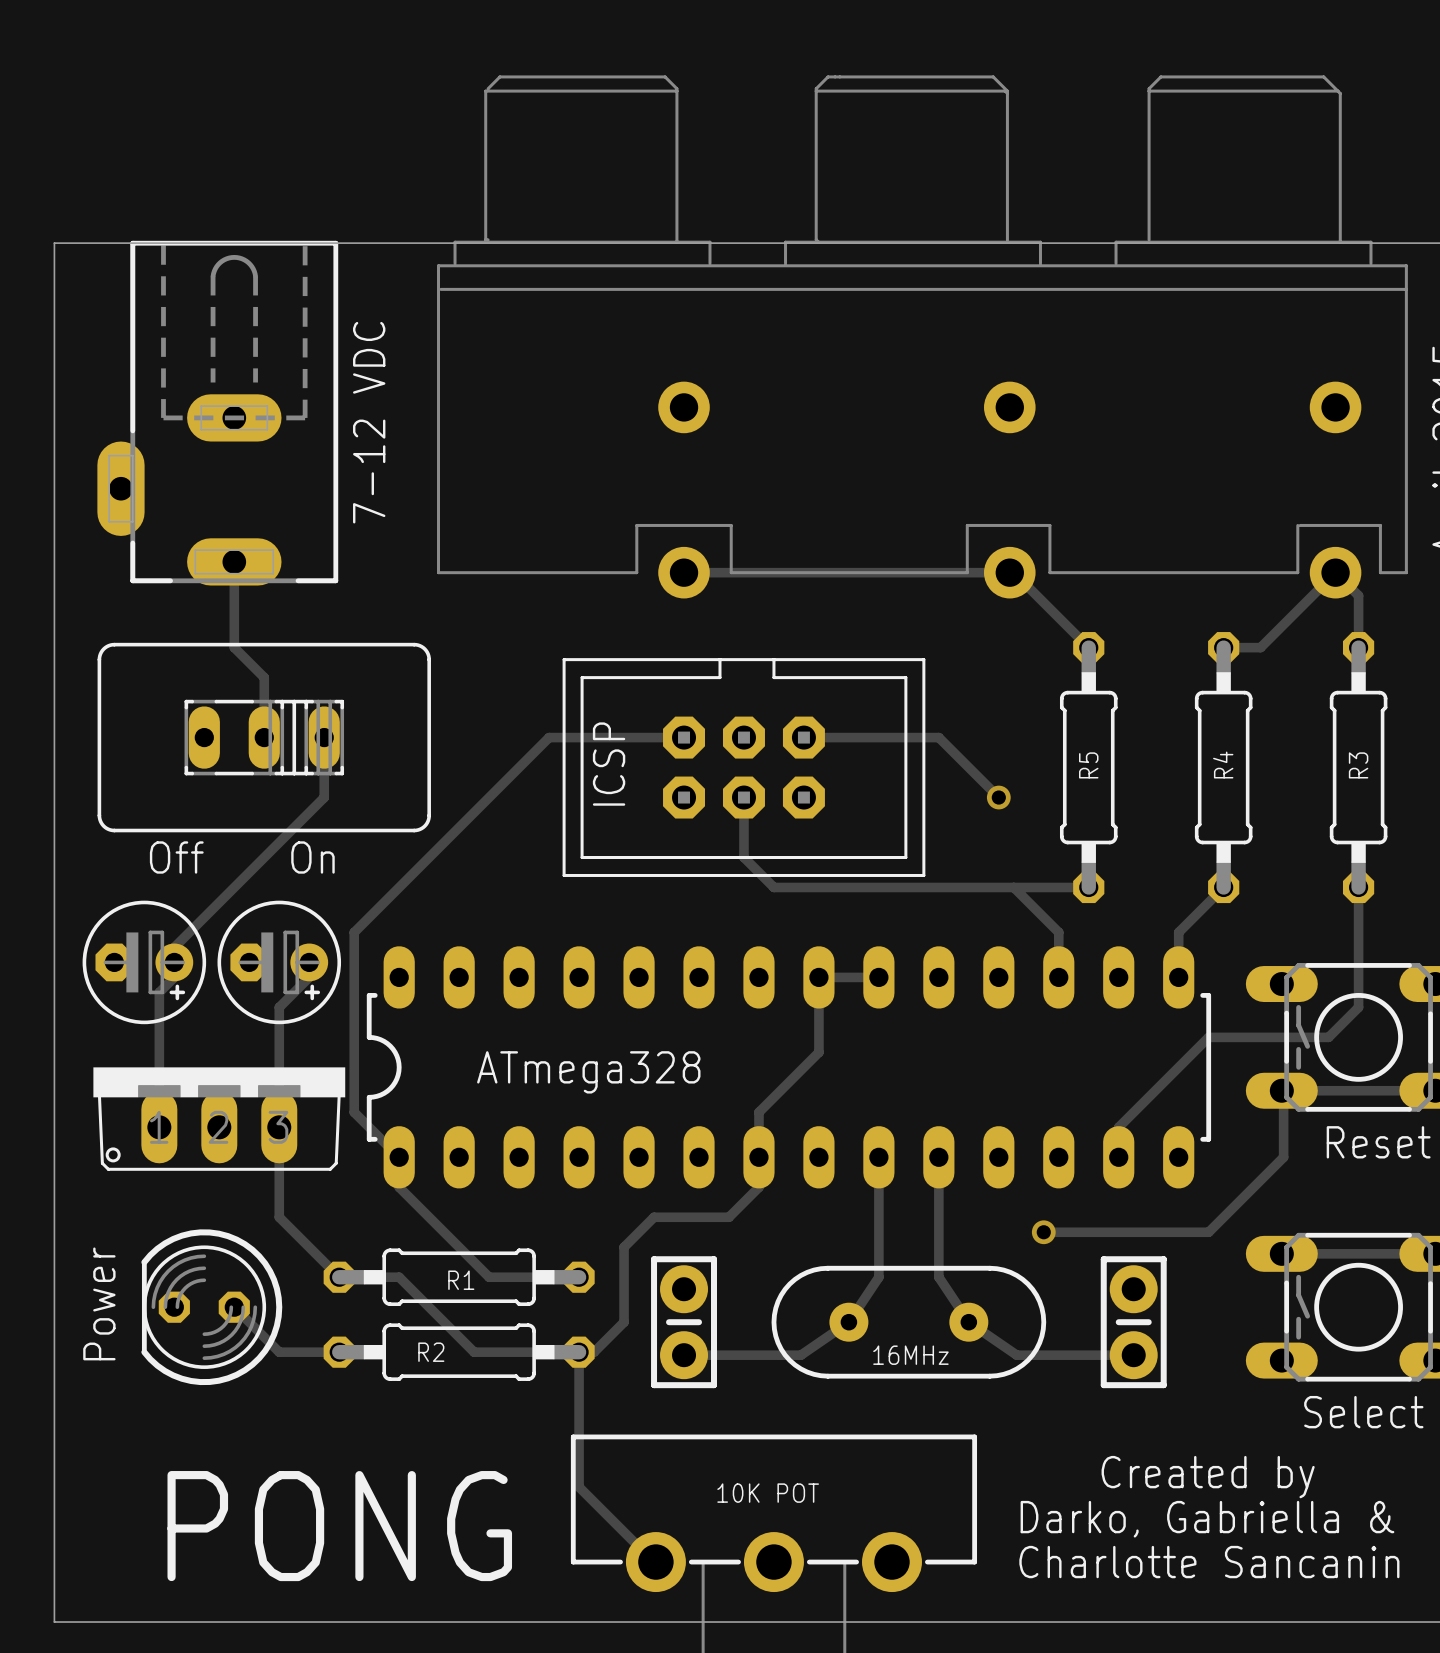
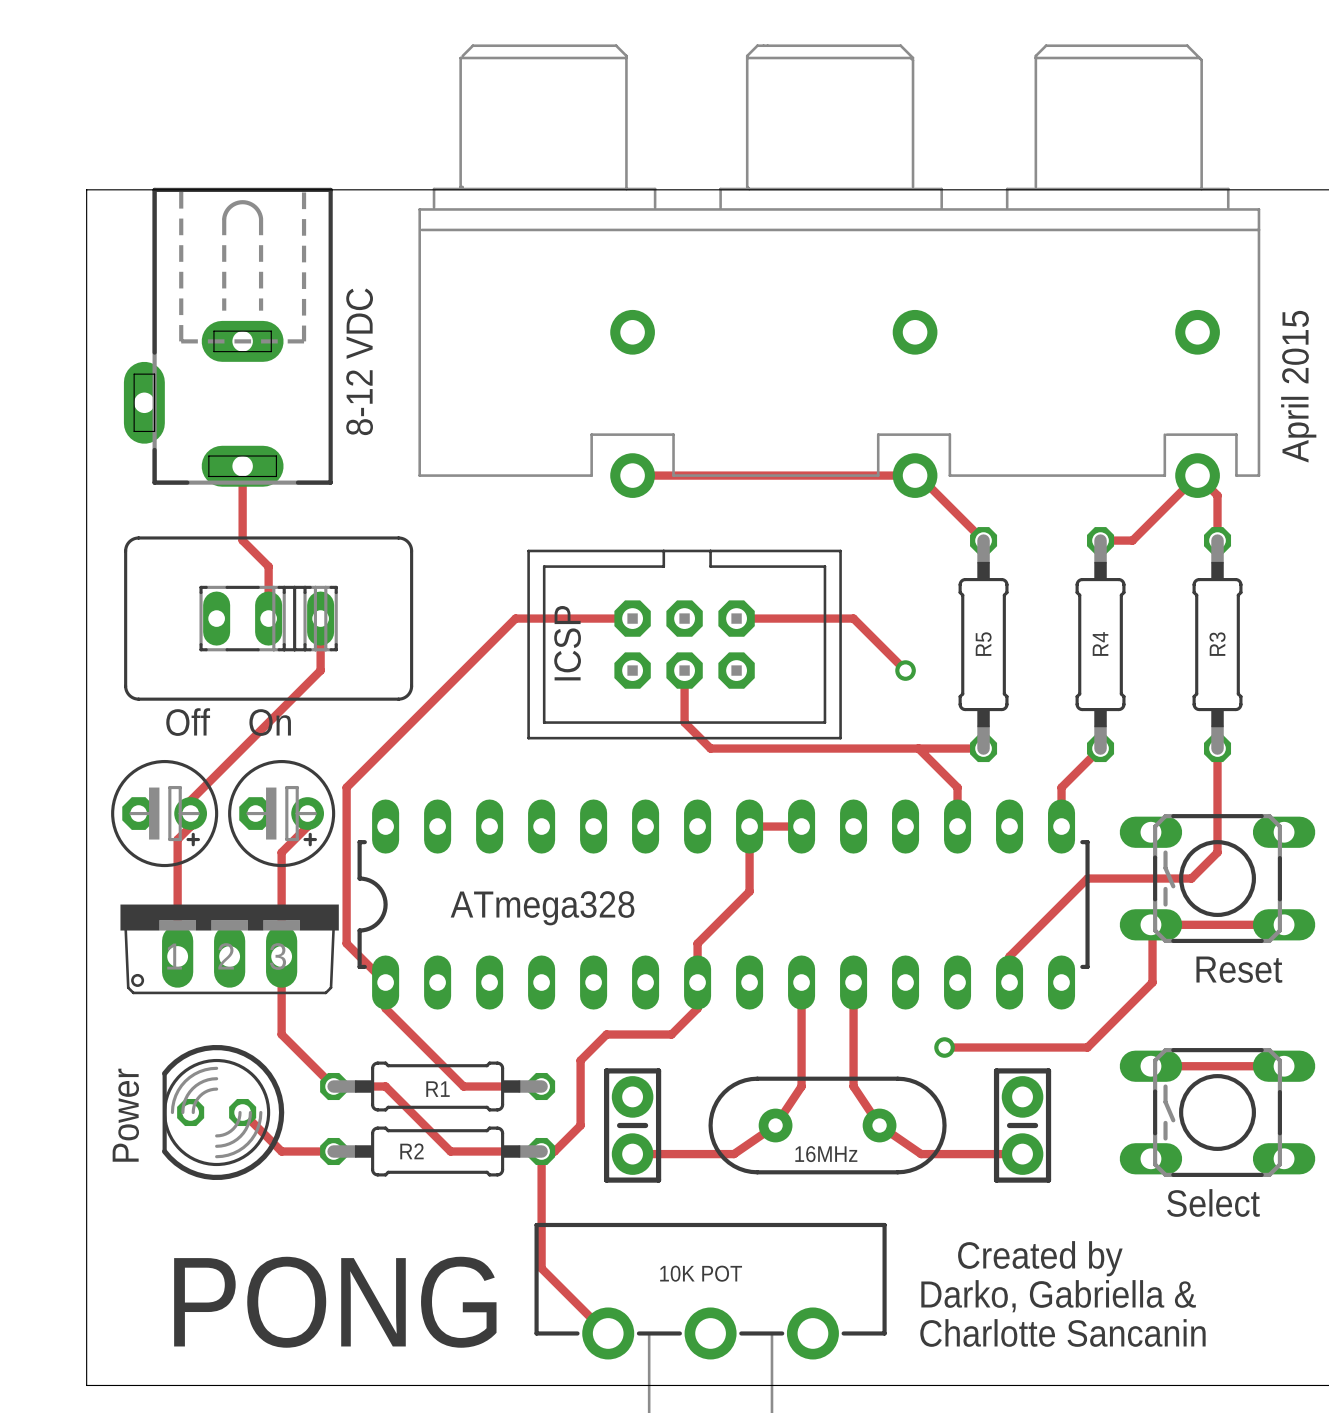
text: 7-12 VDC (369, 422) -> 8-12 VDC (359, 361)

